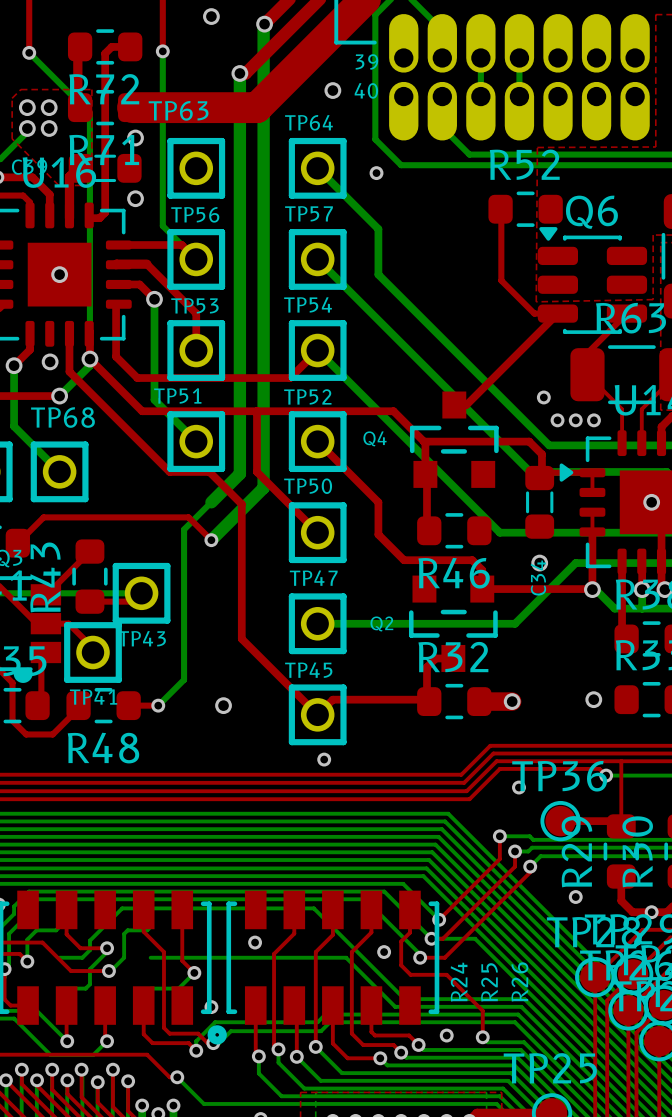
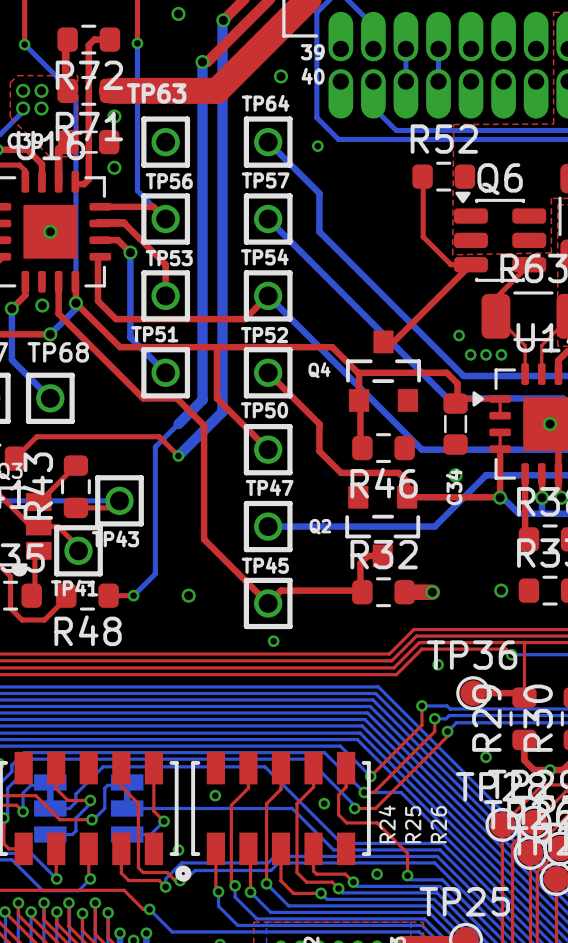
part: none -> (50, 808)
part: none -> (127, 808)

